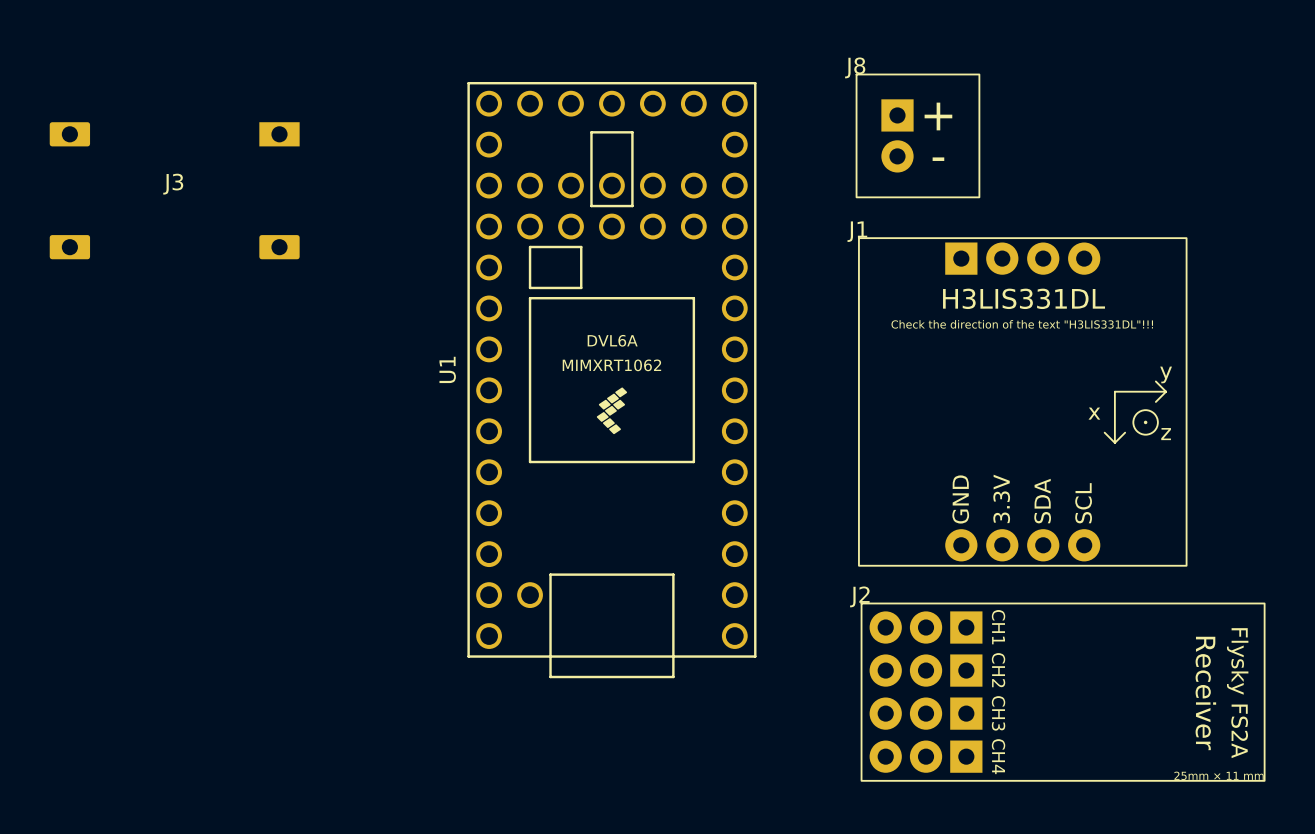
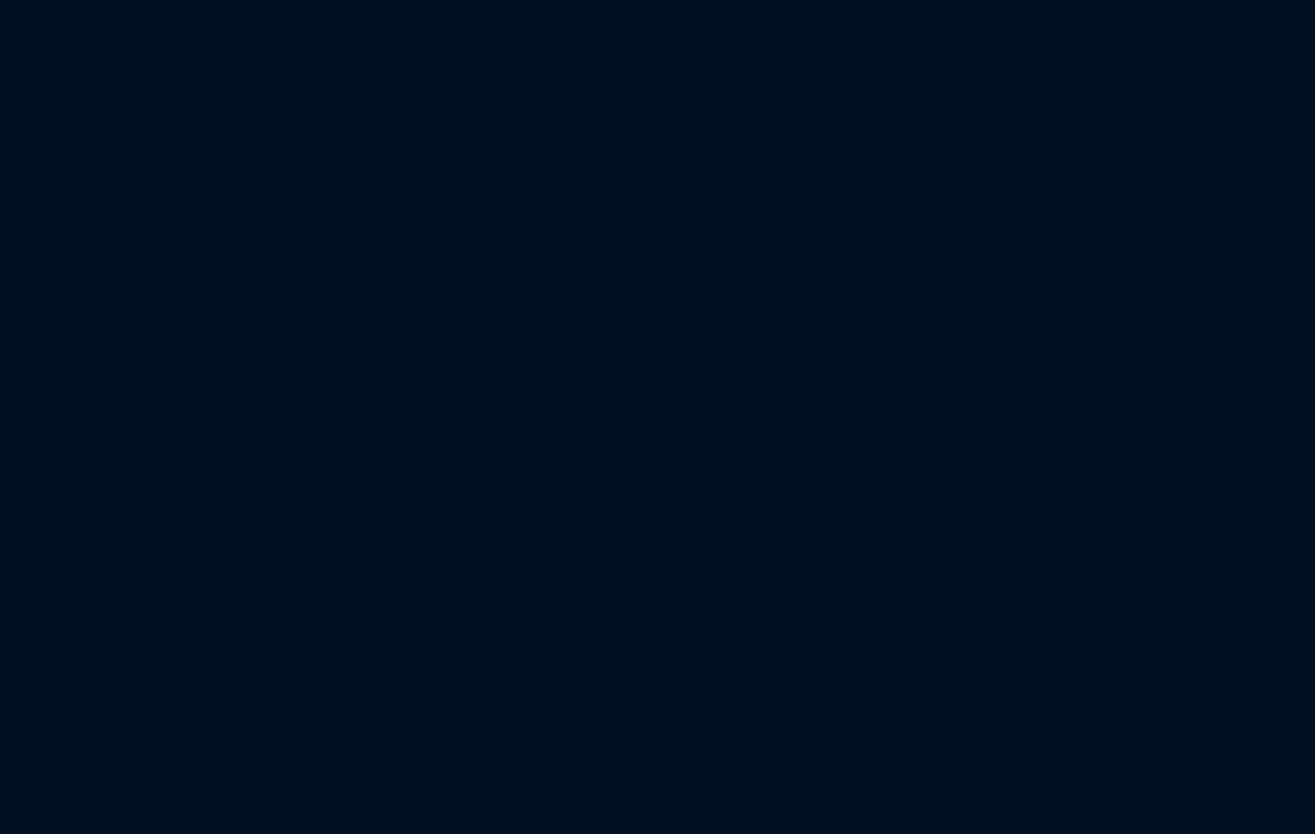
J8: (917, 135) -> none
J3: (174, 190) -> none
U1: (611, 380) -> none
J1: (1022, 401) -> none
J2: (1063, 692) -> none

